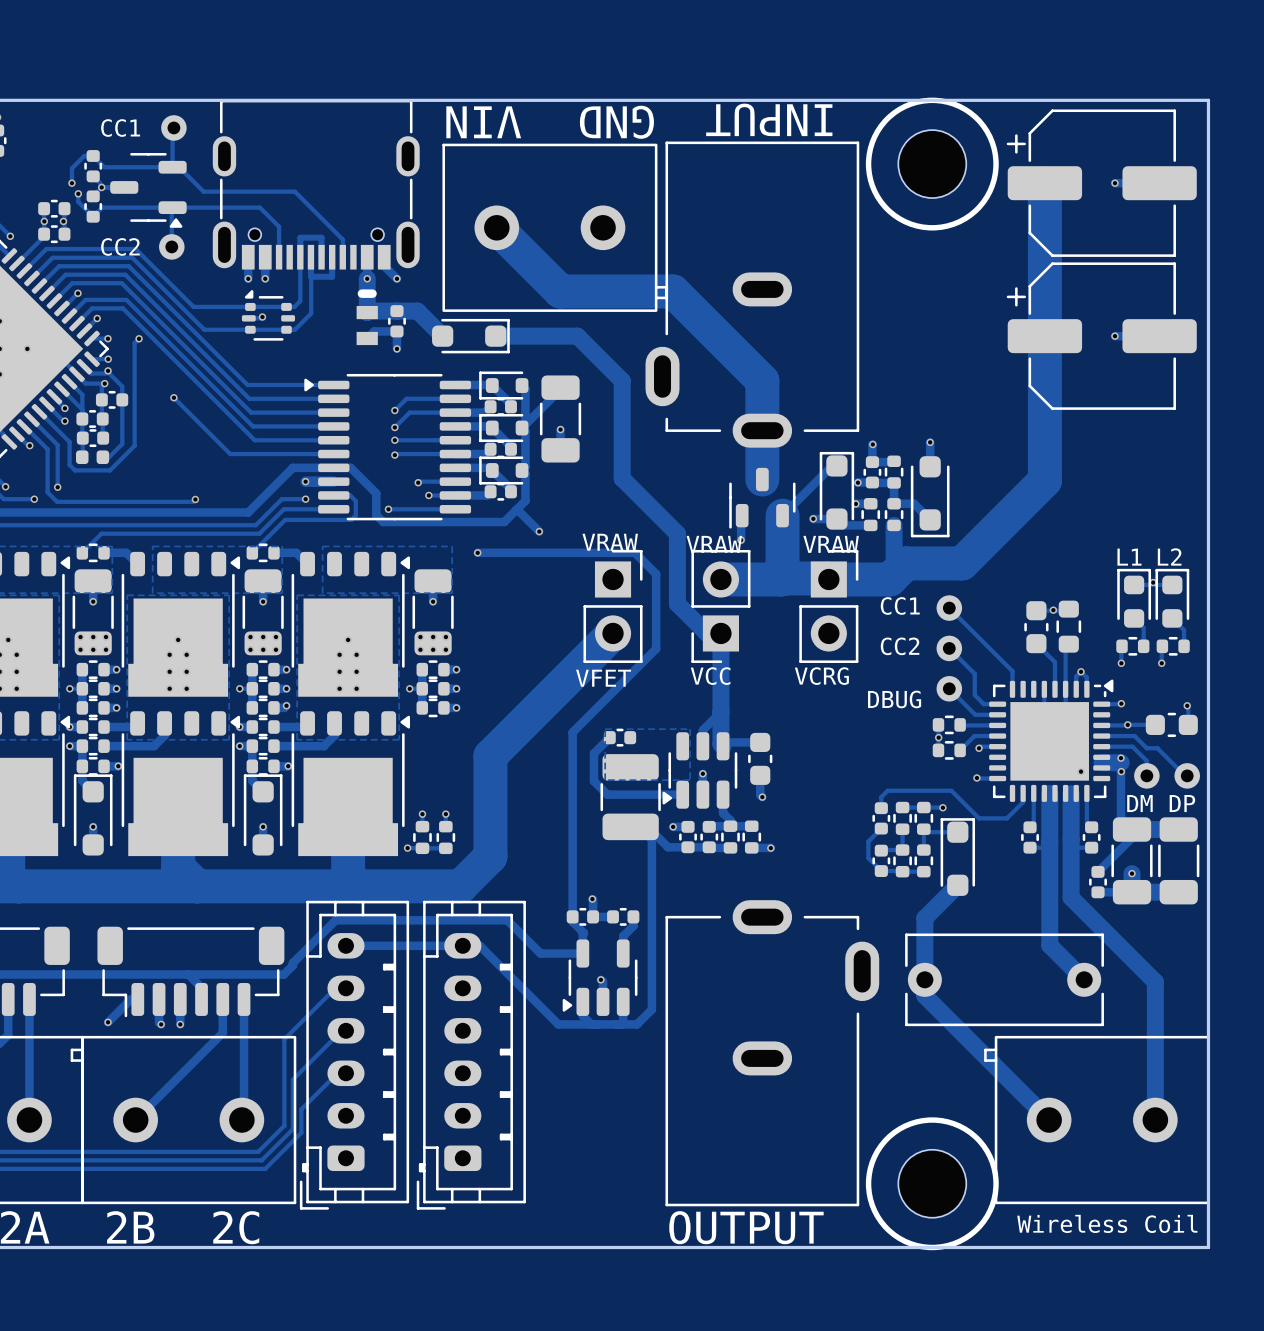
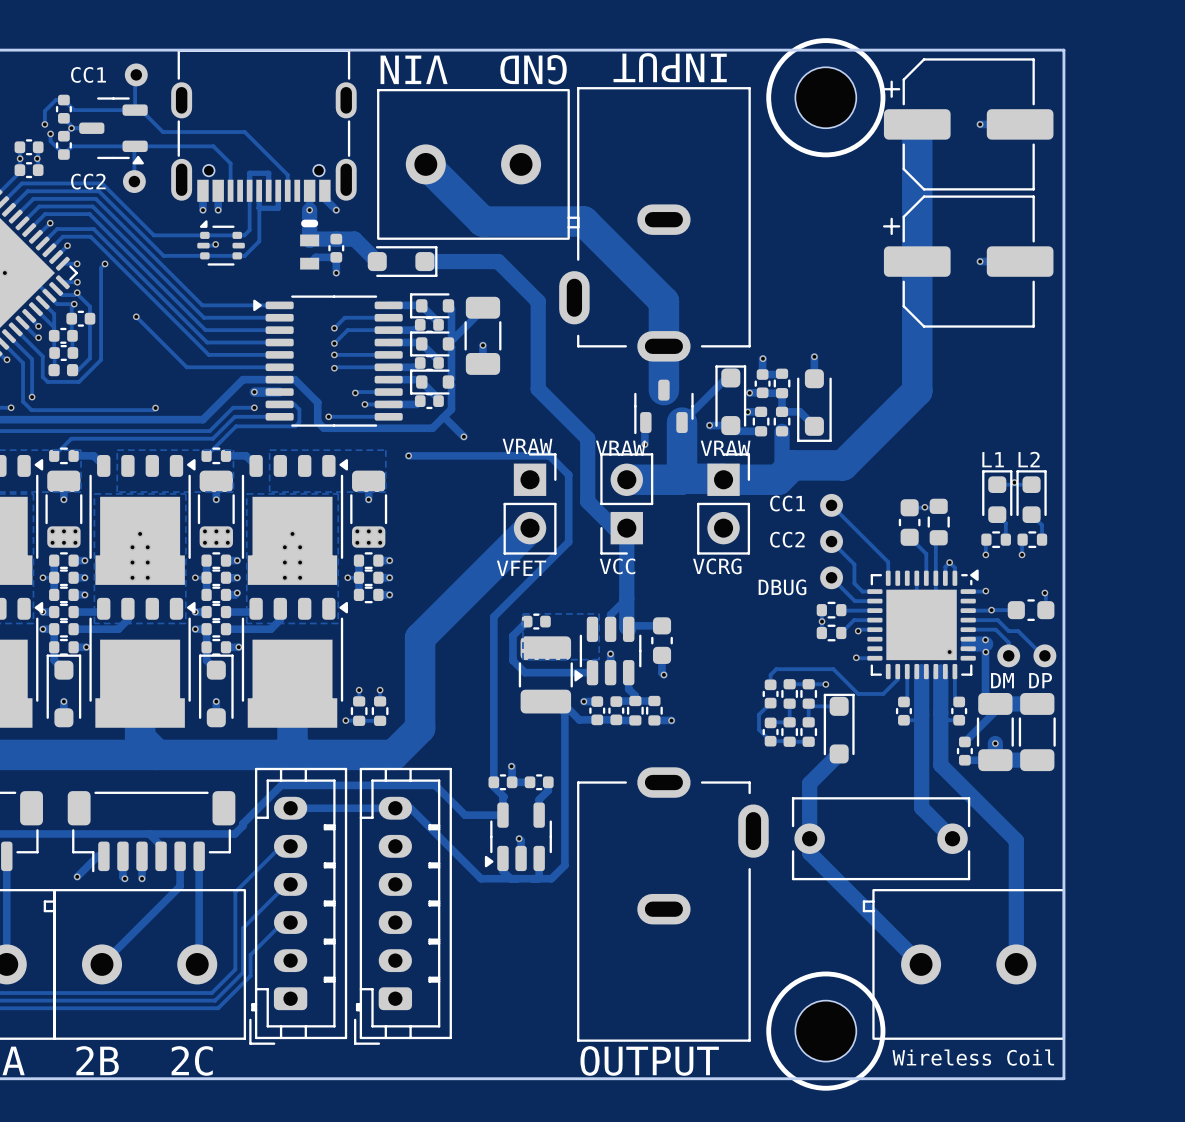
part position: (932, 164) -> (825, 97)
part position: (932, 1183) -> (825, 1031)

